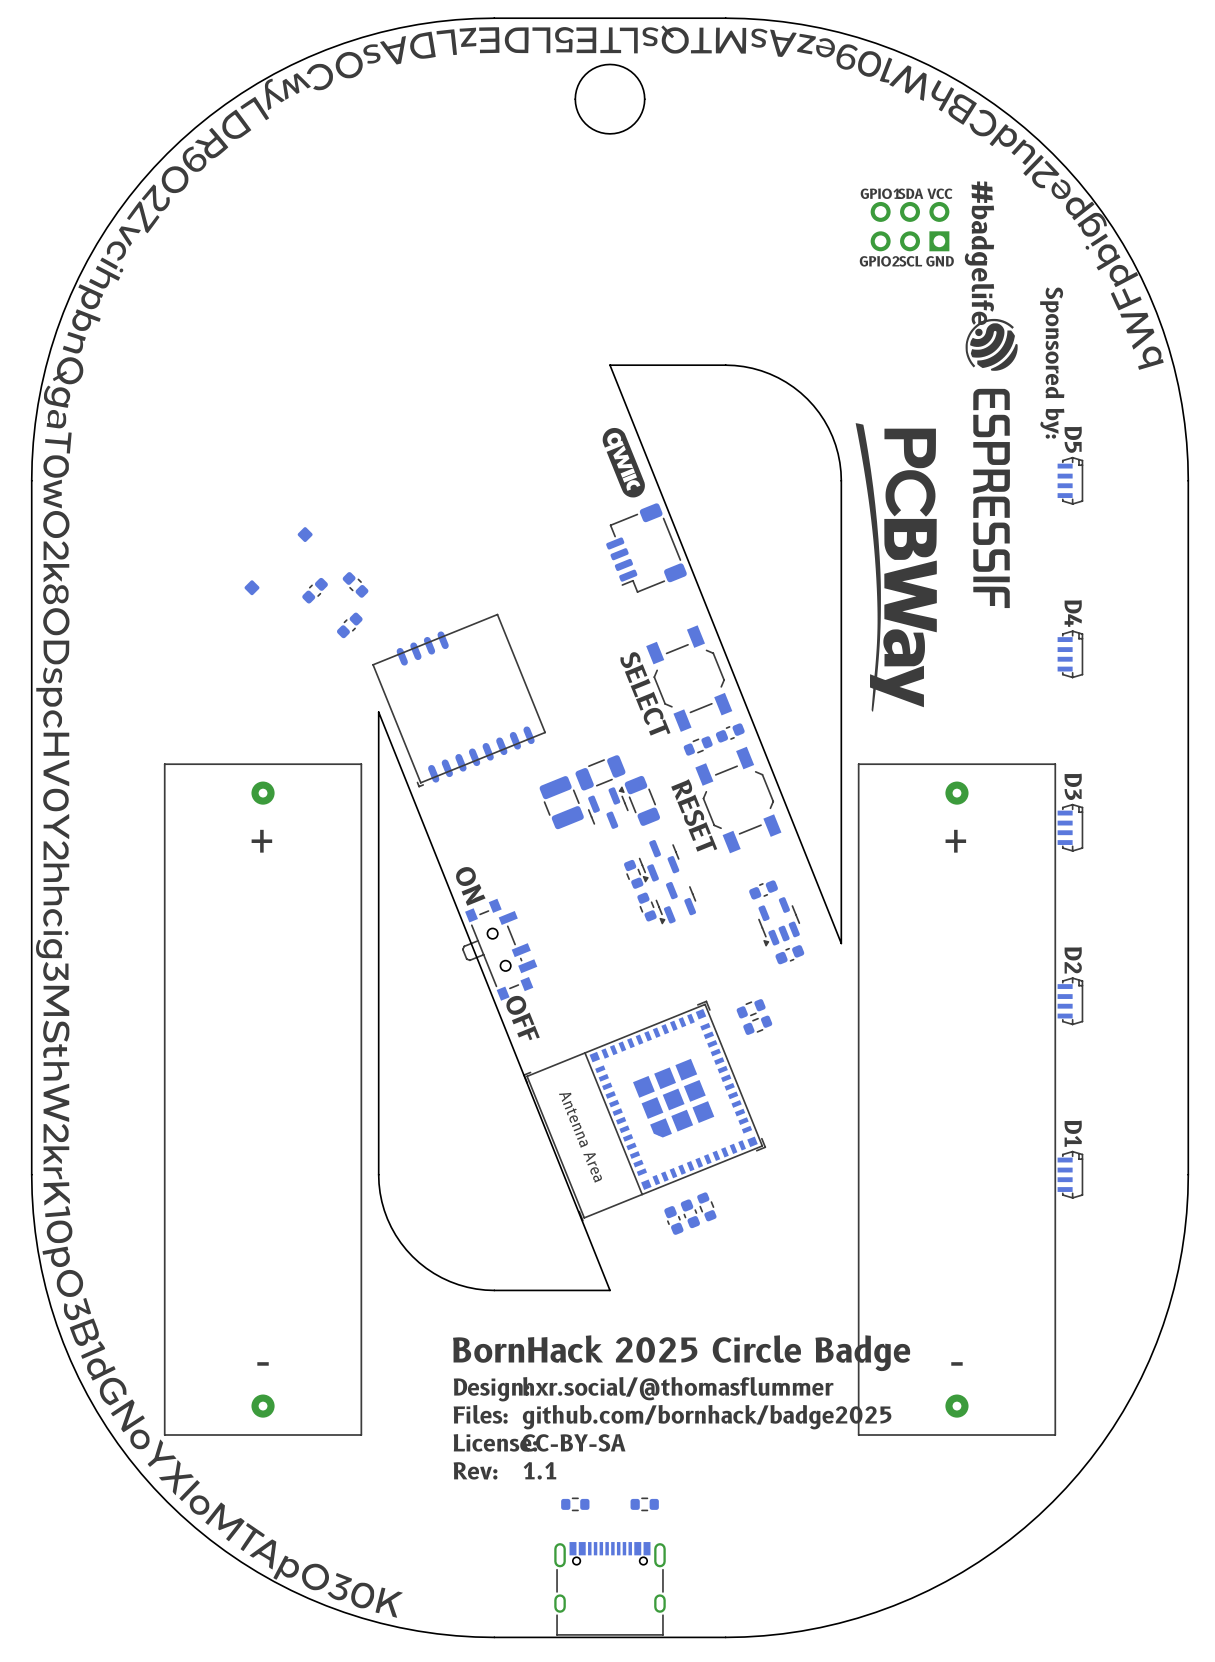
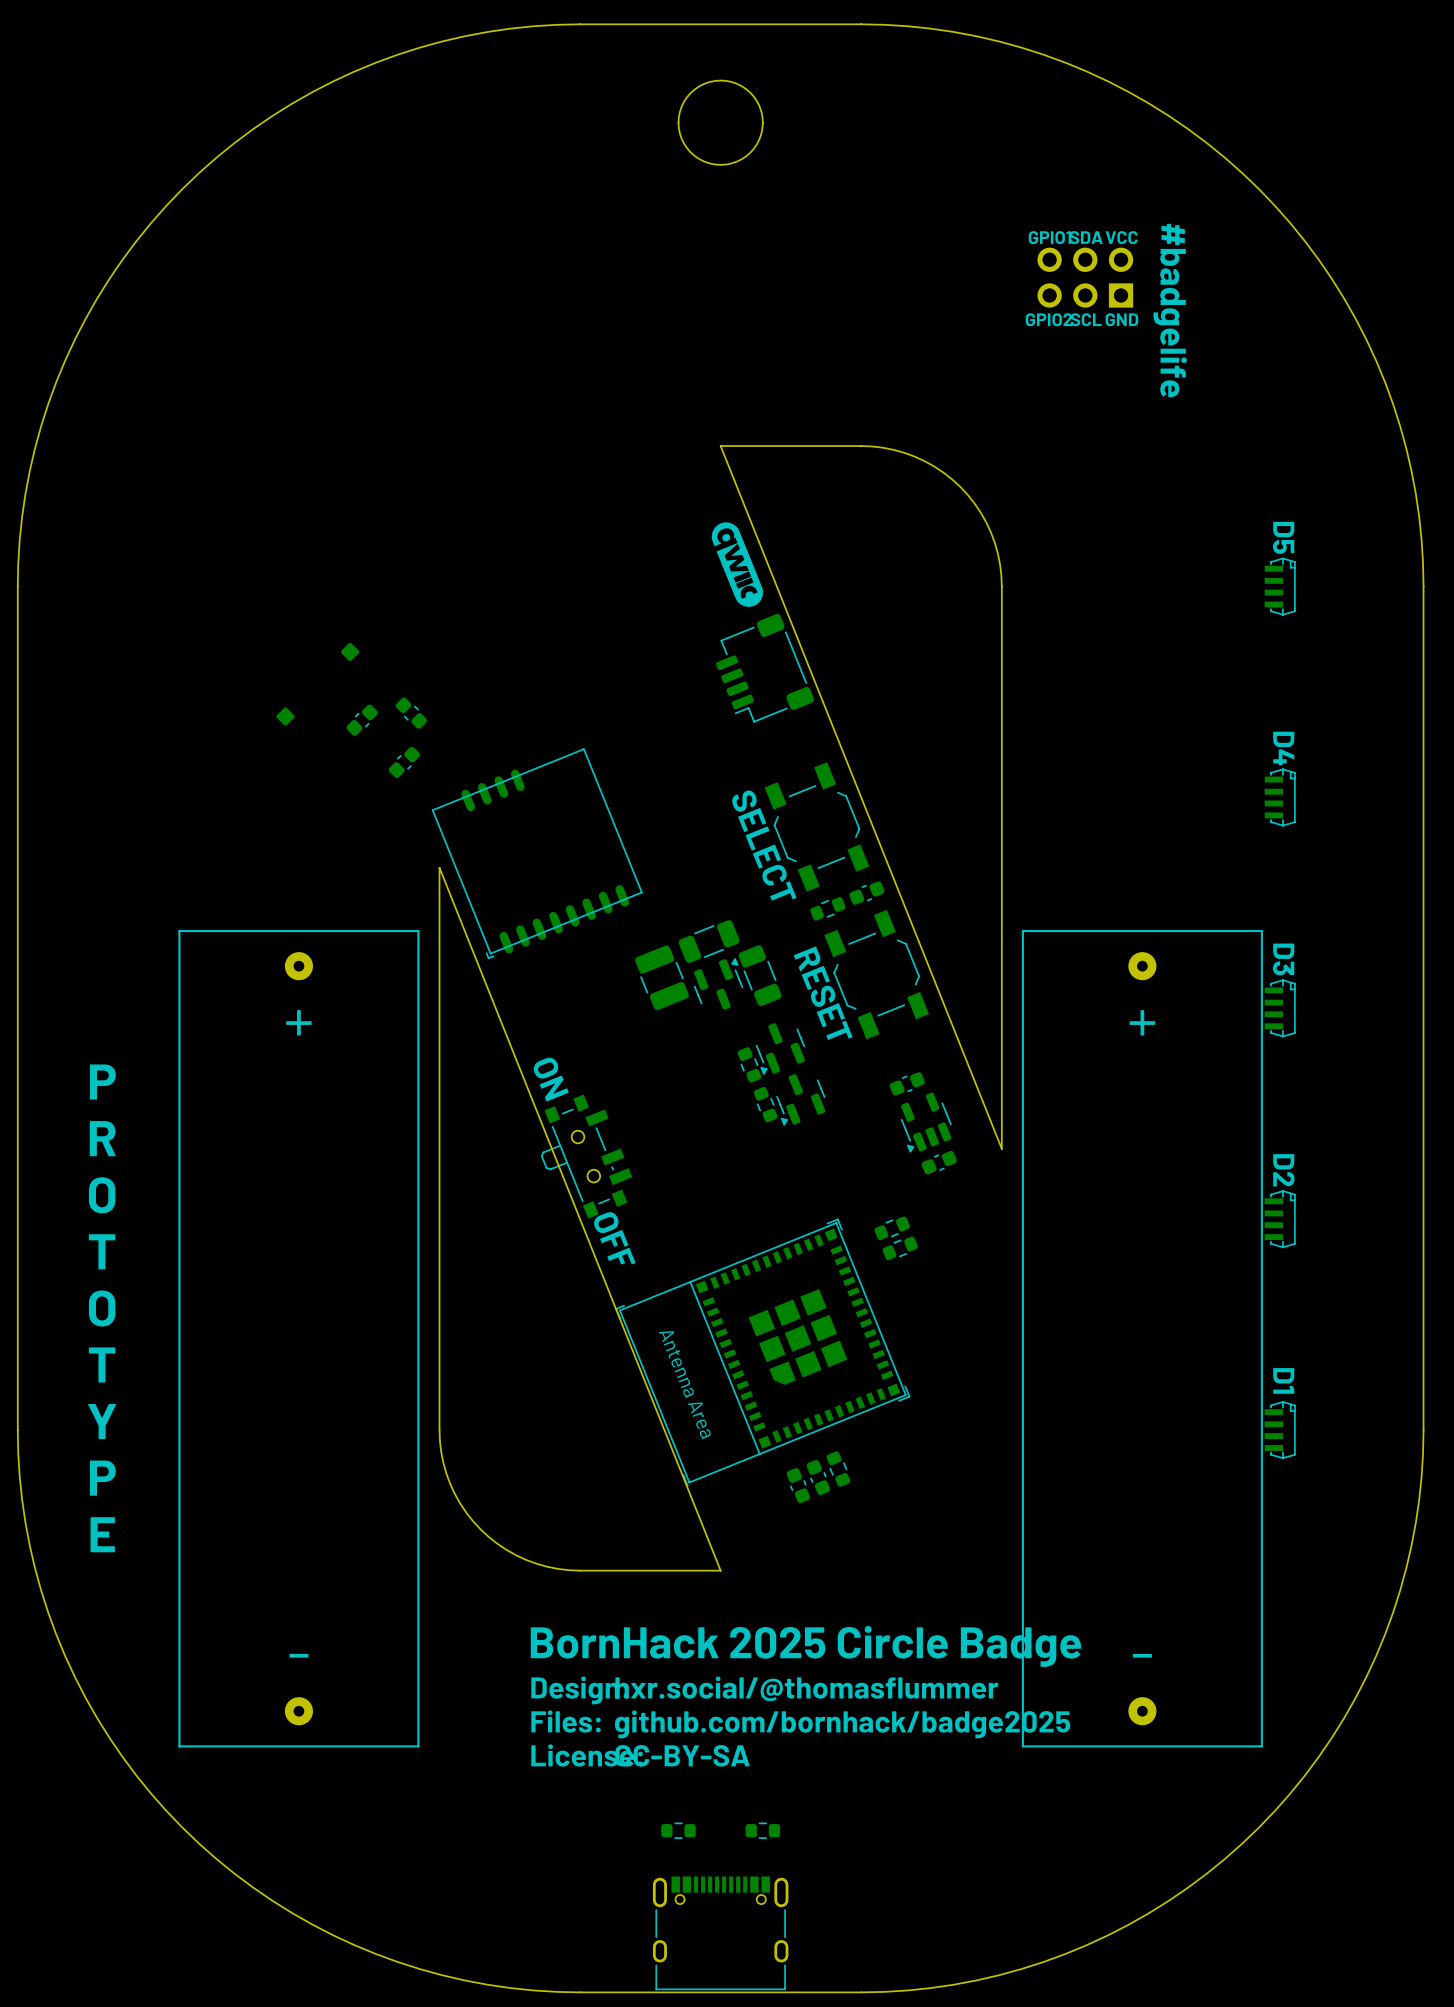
drawing: [36, 25, 1164, 1618] -> none
text: Sponsored by: (1052, 363) -> none
text: none -> P (102, 1082)
text: none -> R (102, 1138)
text: none -> O (102, 1195)
text: none -> T (102, 1251)
text: none -> O (102, 1308)
text: none -> T (102, 1364)
text: none -> Y (102, 1421)
text: none -> P (102, 1478)
text: none -> E (102, 1534)
text: Rev: (475, 1470) -> none
text: 1.1 (539, 1470) -> none

